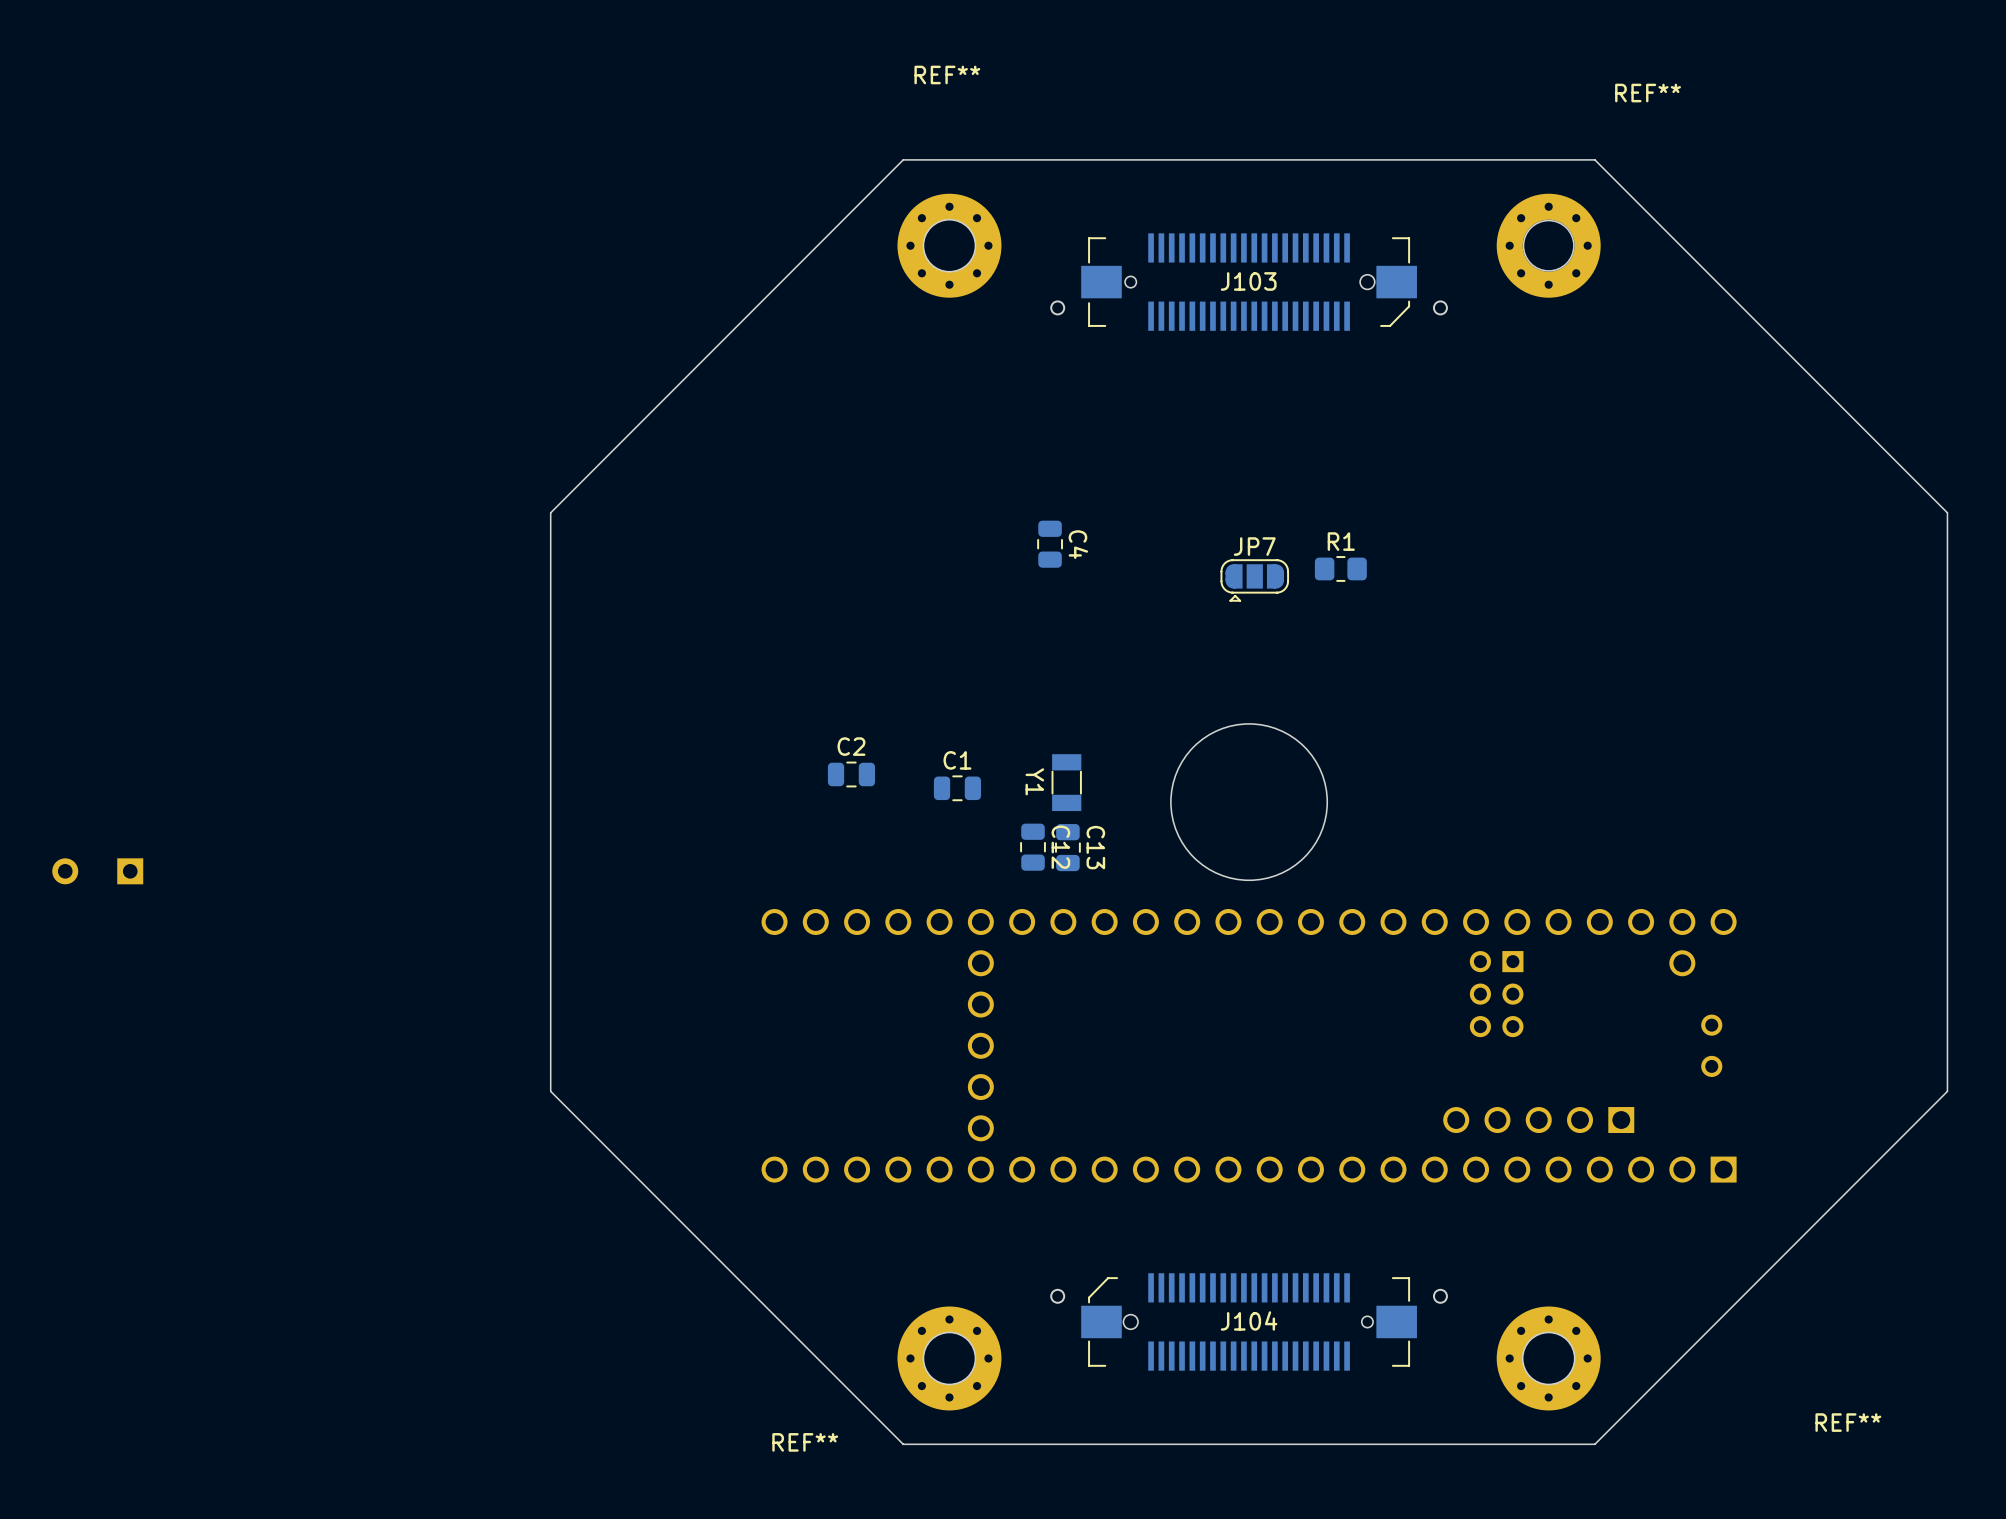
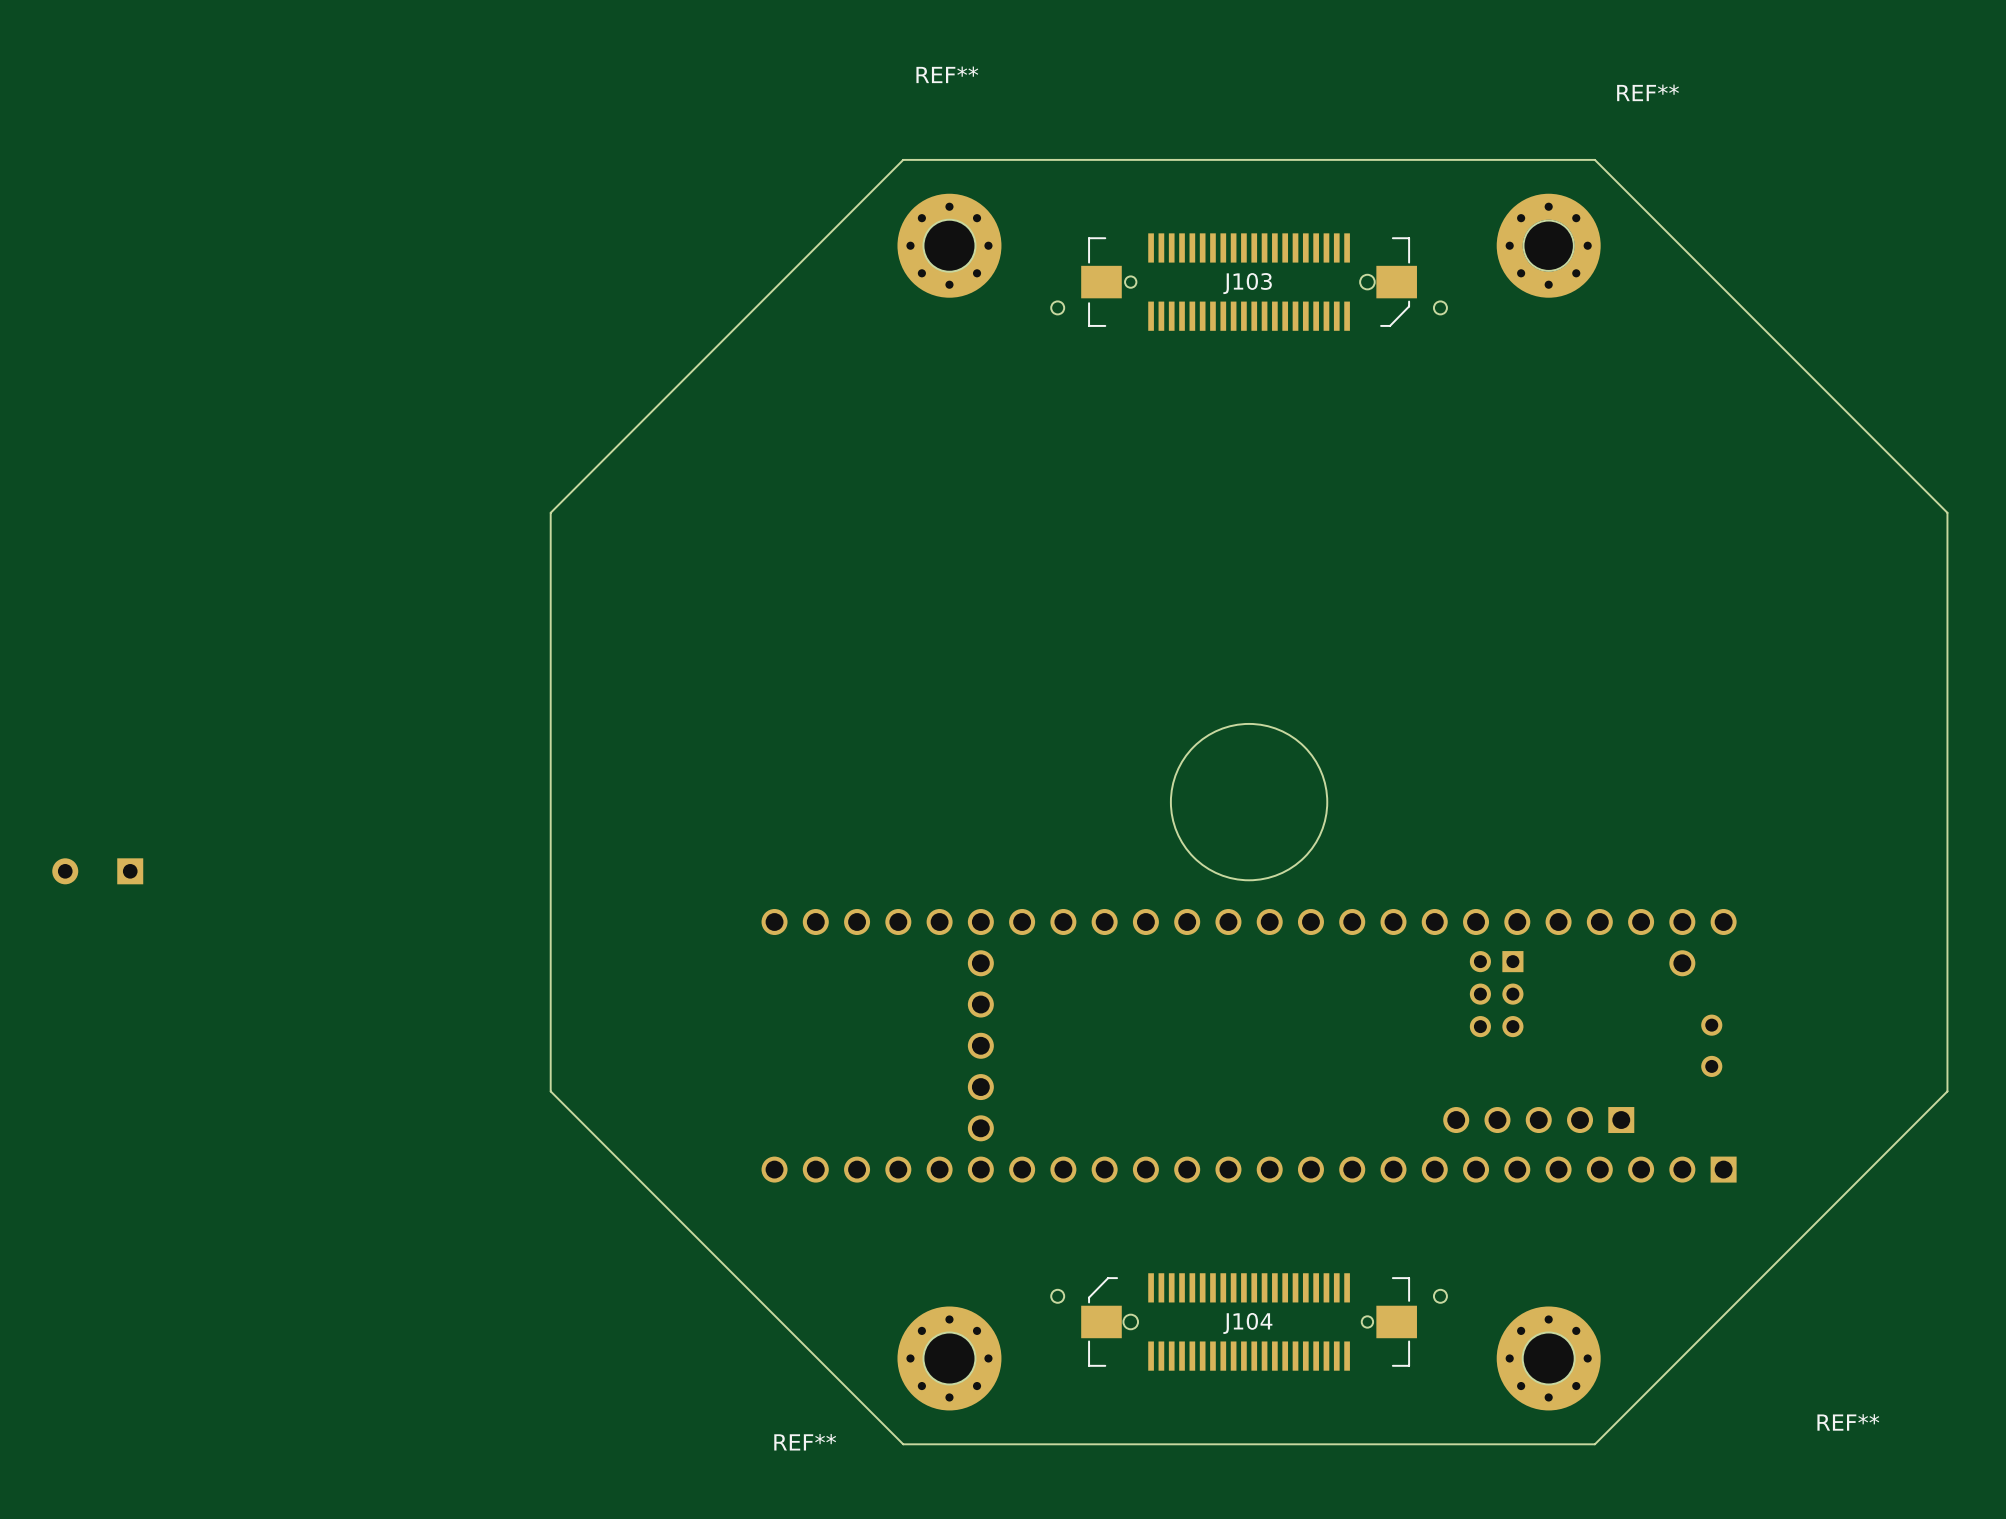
C4: (1050, 544) -> none
R1: (1340, 568) -> none
JP7: (1254, 580) -> none
C2: (851, 774) -> none
Y1: (1066, 782) -> none
C1: (957, 788) -> none
C12: (1033, 847) -> none
C13: (1067, 847) -> none

